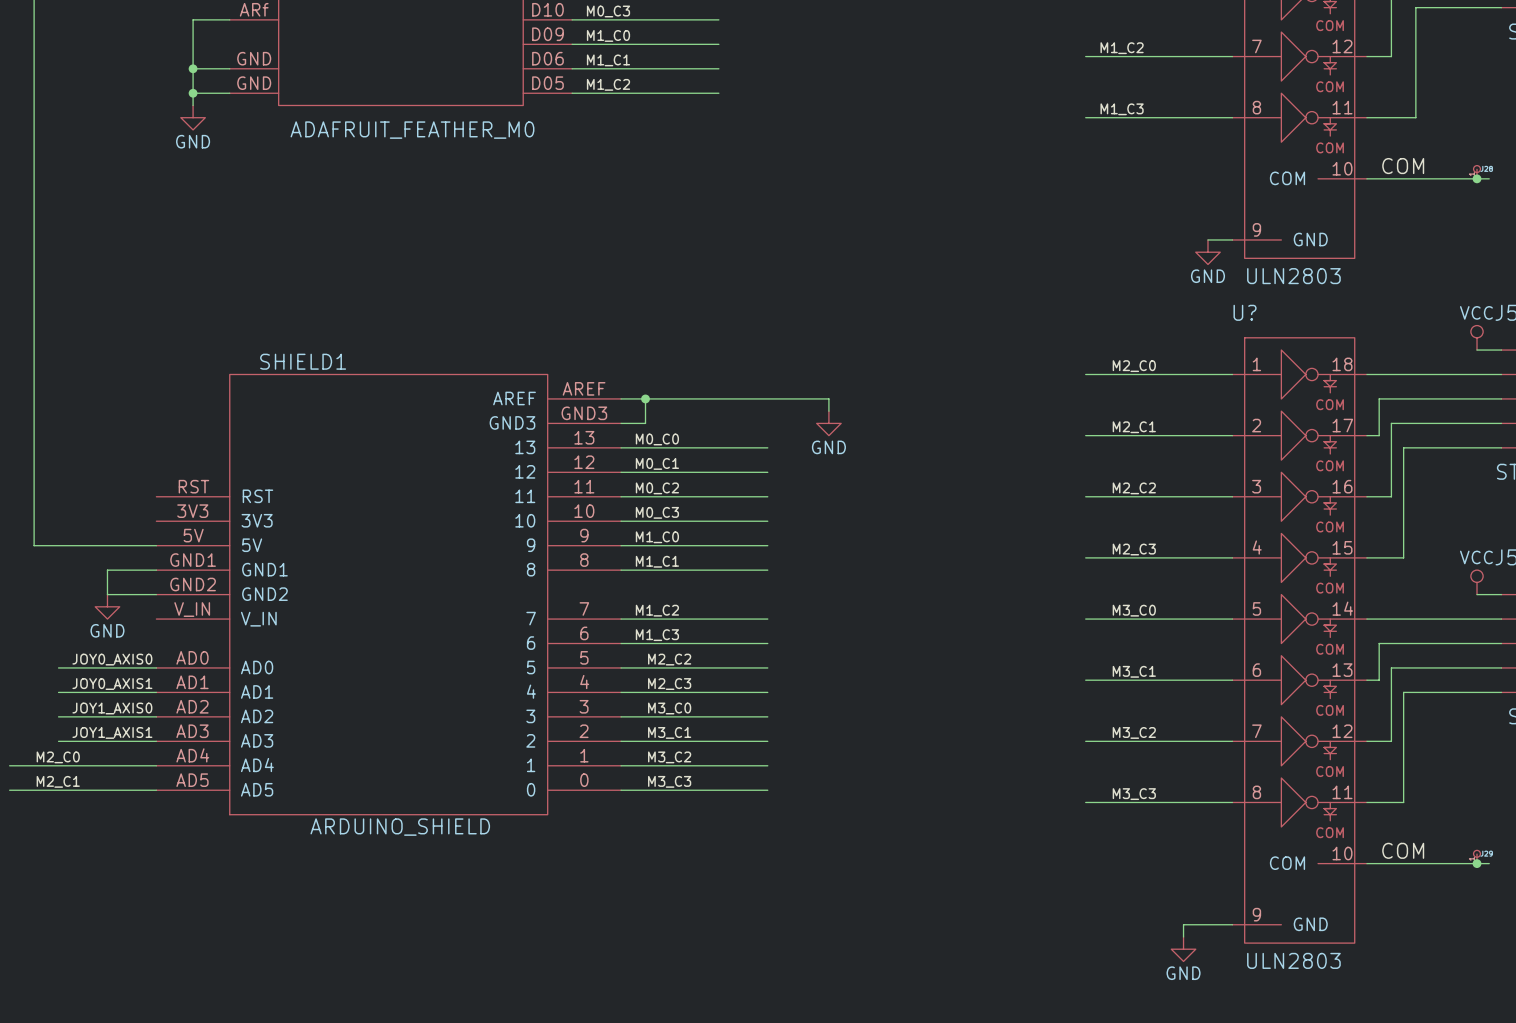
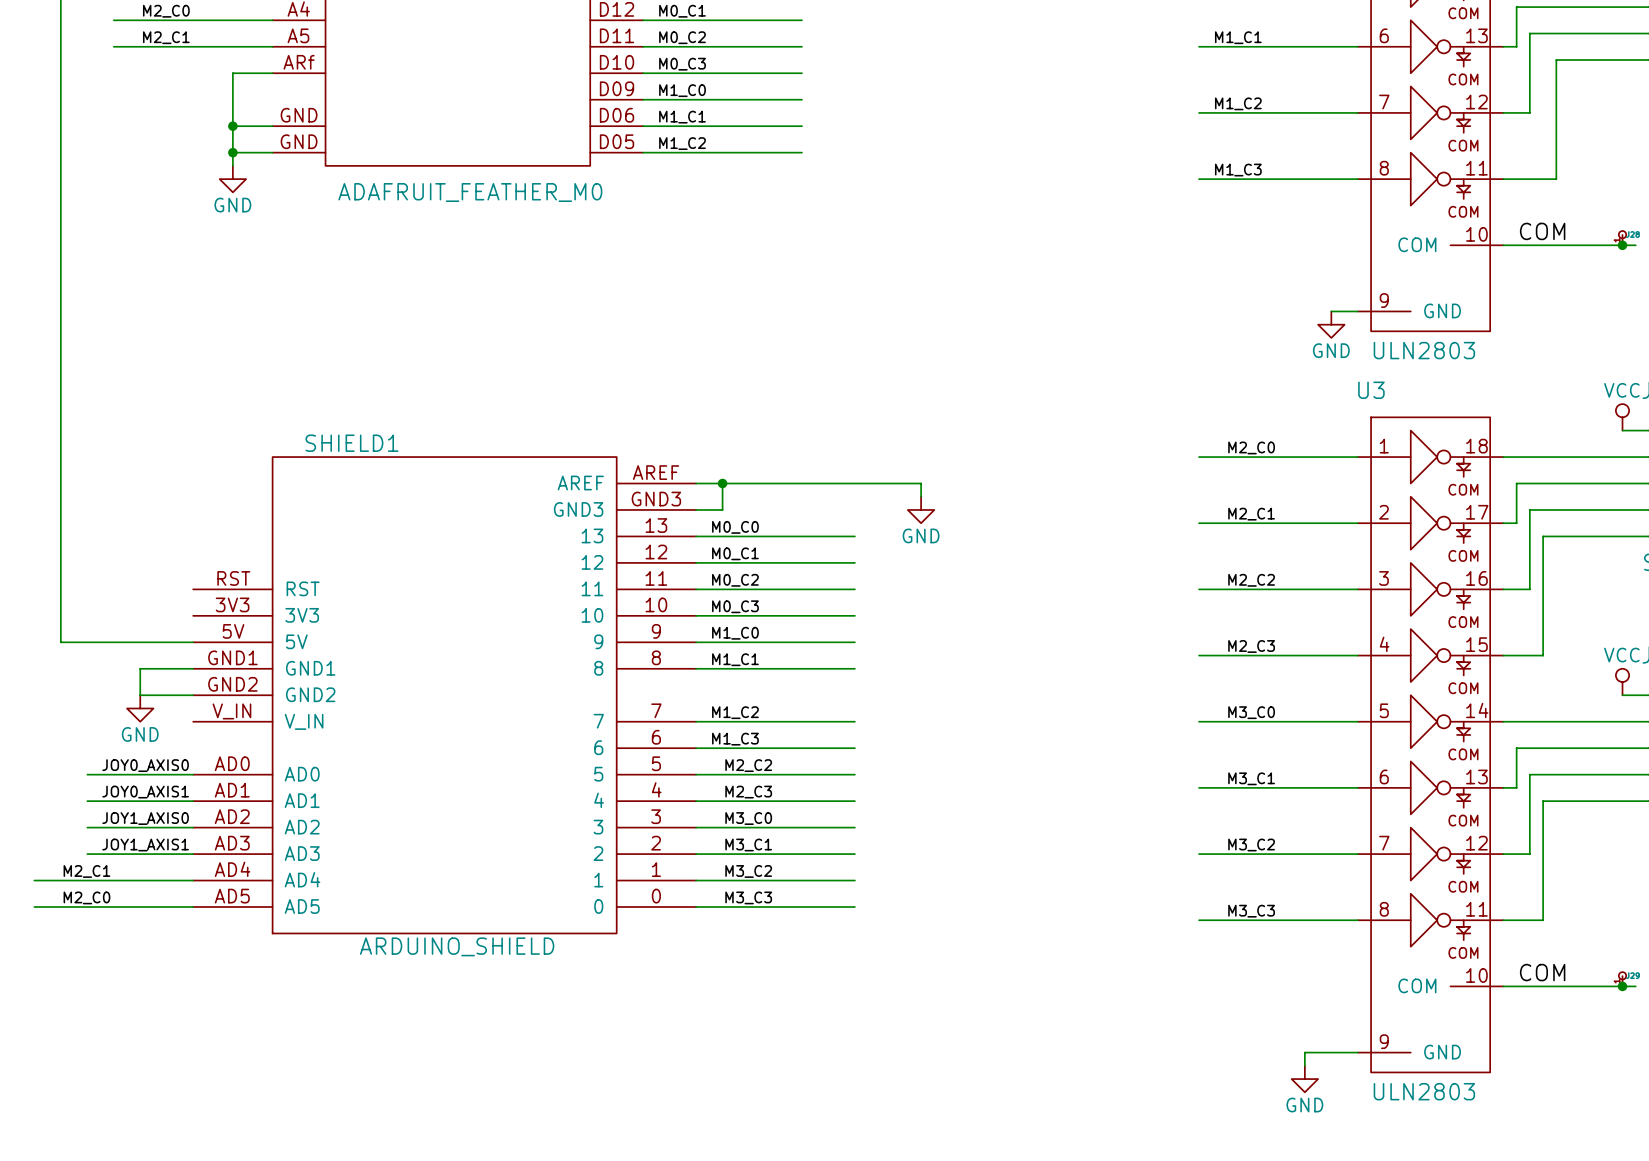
U? name: U? (1245, 312) -> U3 (1371, 390)
label: M2_C0 (58, 757) -> M2_C1 (86, 871)
label: M2_C1 (58, 781) -> M2_C0 (86, 897)

